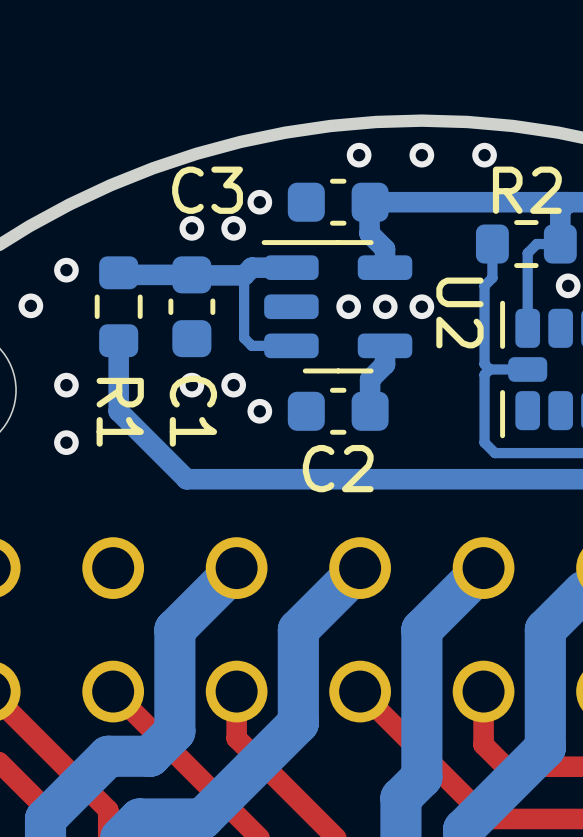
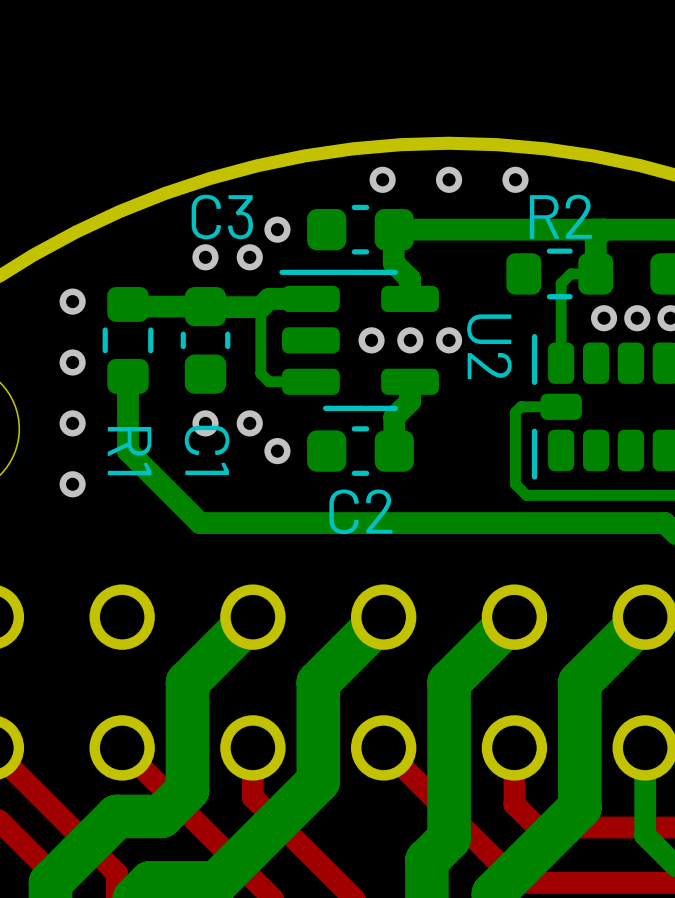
bottom track: (492, 244) (492, 277) (484, 285) (484, 364) (489, 369) -> none
via position: (30, 305) -> (72, 362)

